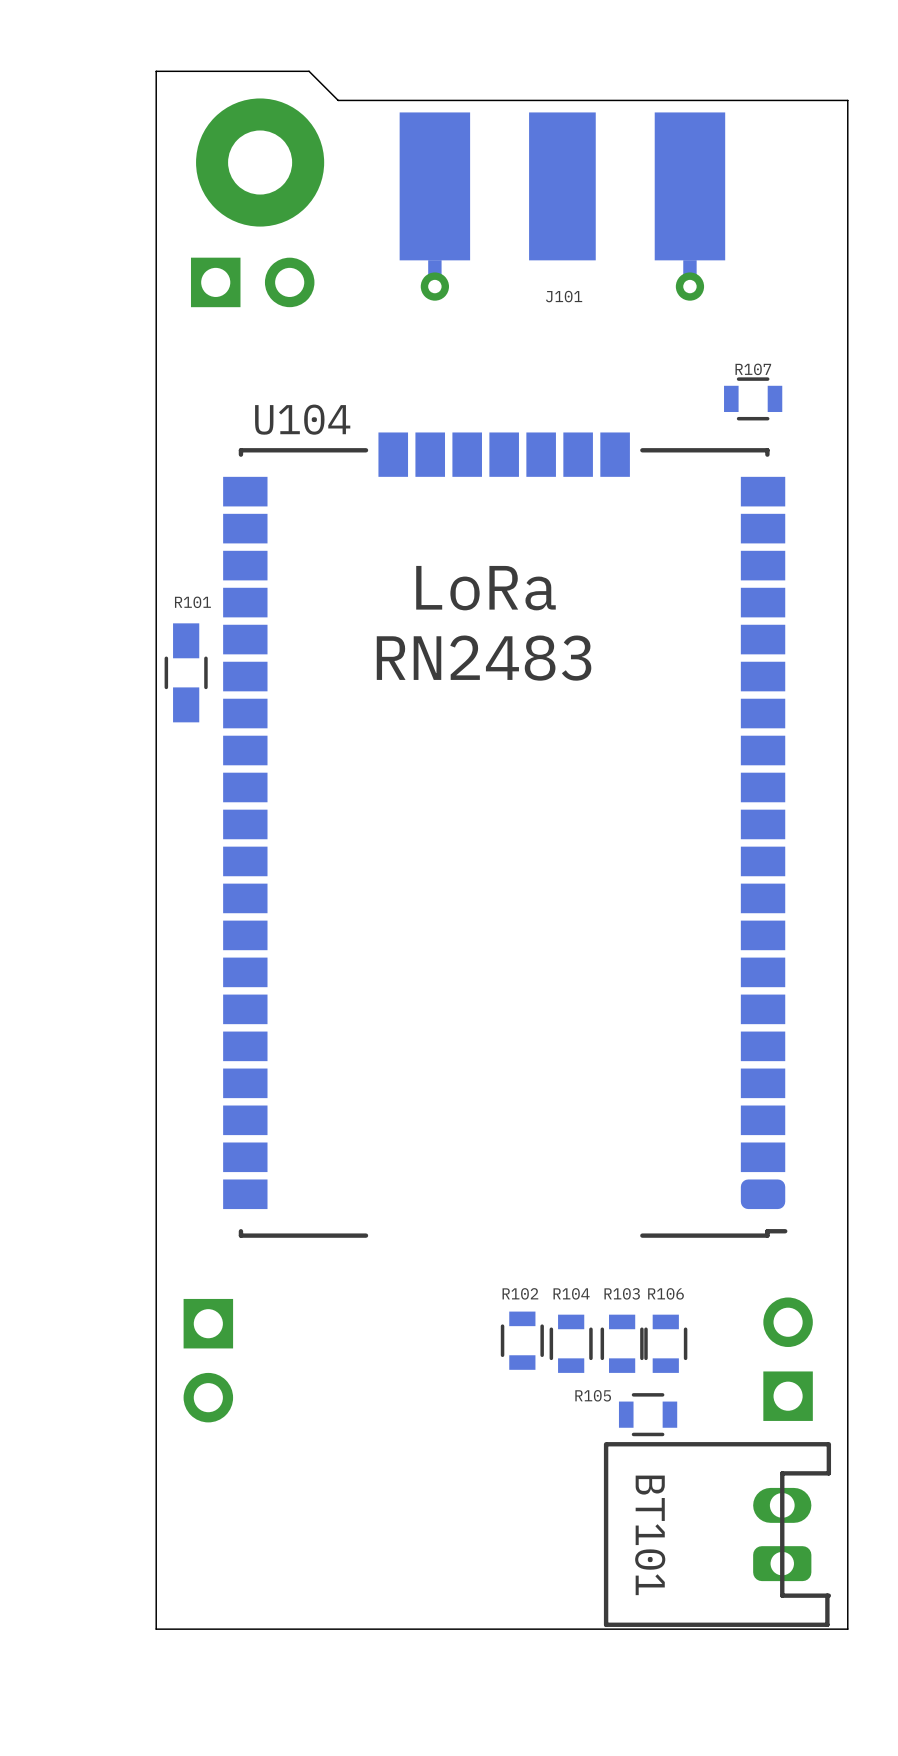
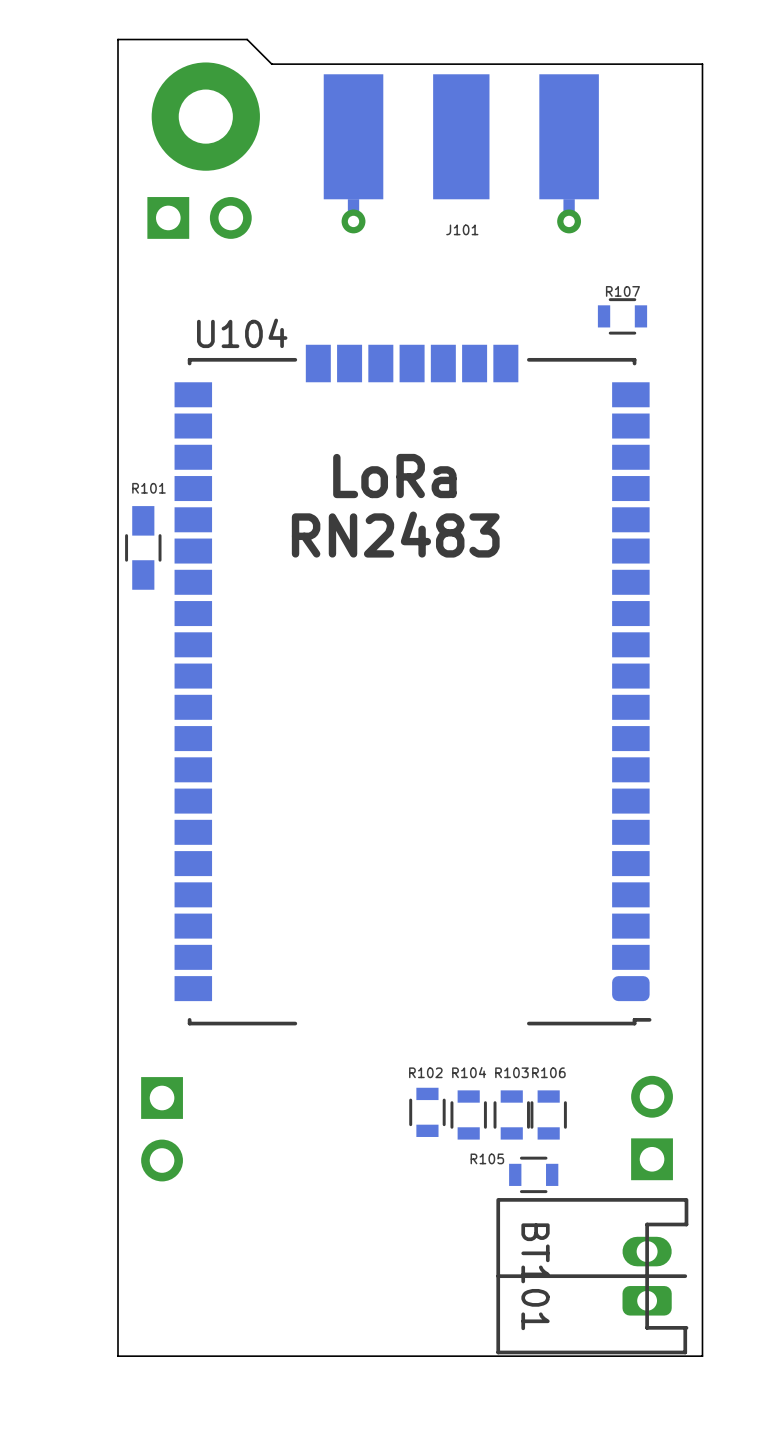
BT101 footprint: [603, 1442, 832, 1627] -> [496, 1198, 689, 1355]

